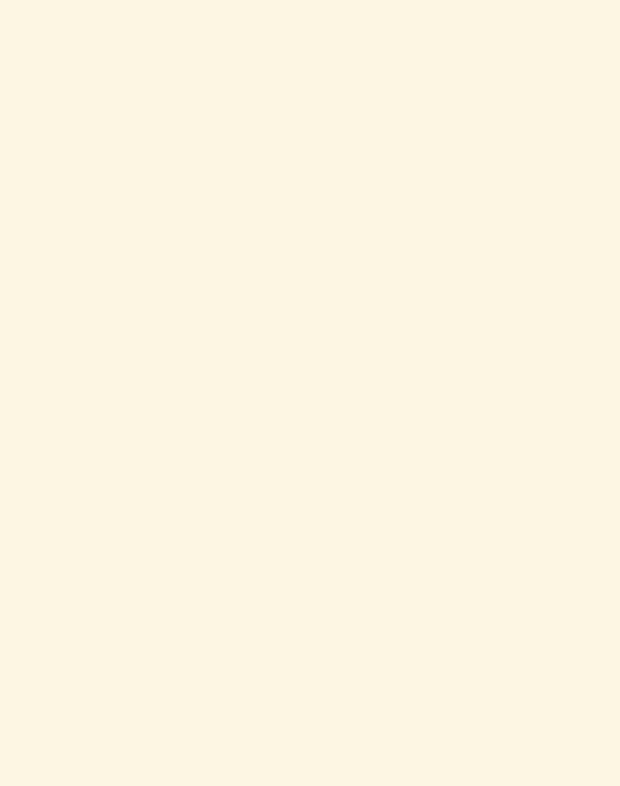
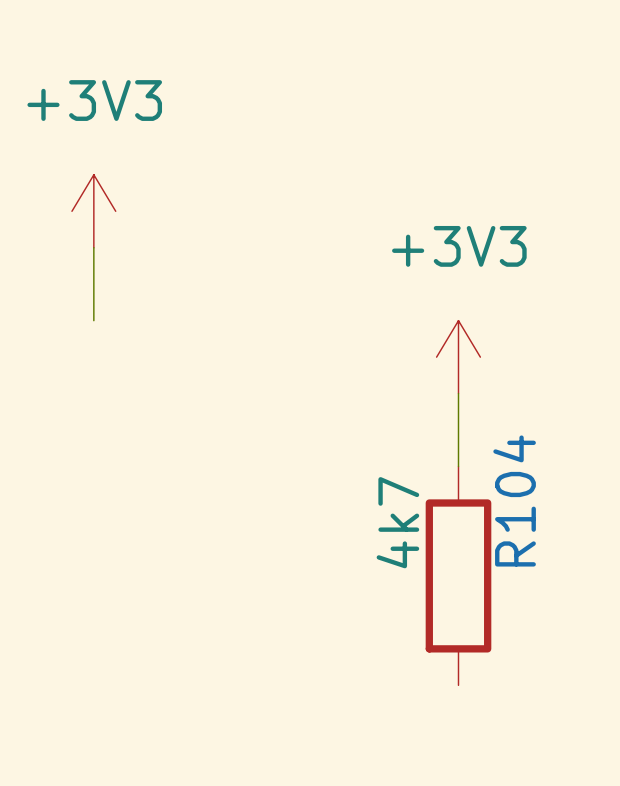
power symbol: none -> +3V3 (93, 211)
wire: none -> (93, 247) (93, 320)
power symbol: none -> +3V3 (458, 357)
wire: none -> (458, 393) (458, 466)
R104: none -> 4k7 (458, 575)

